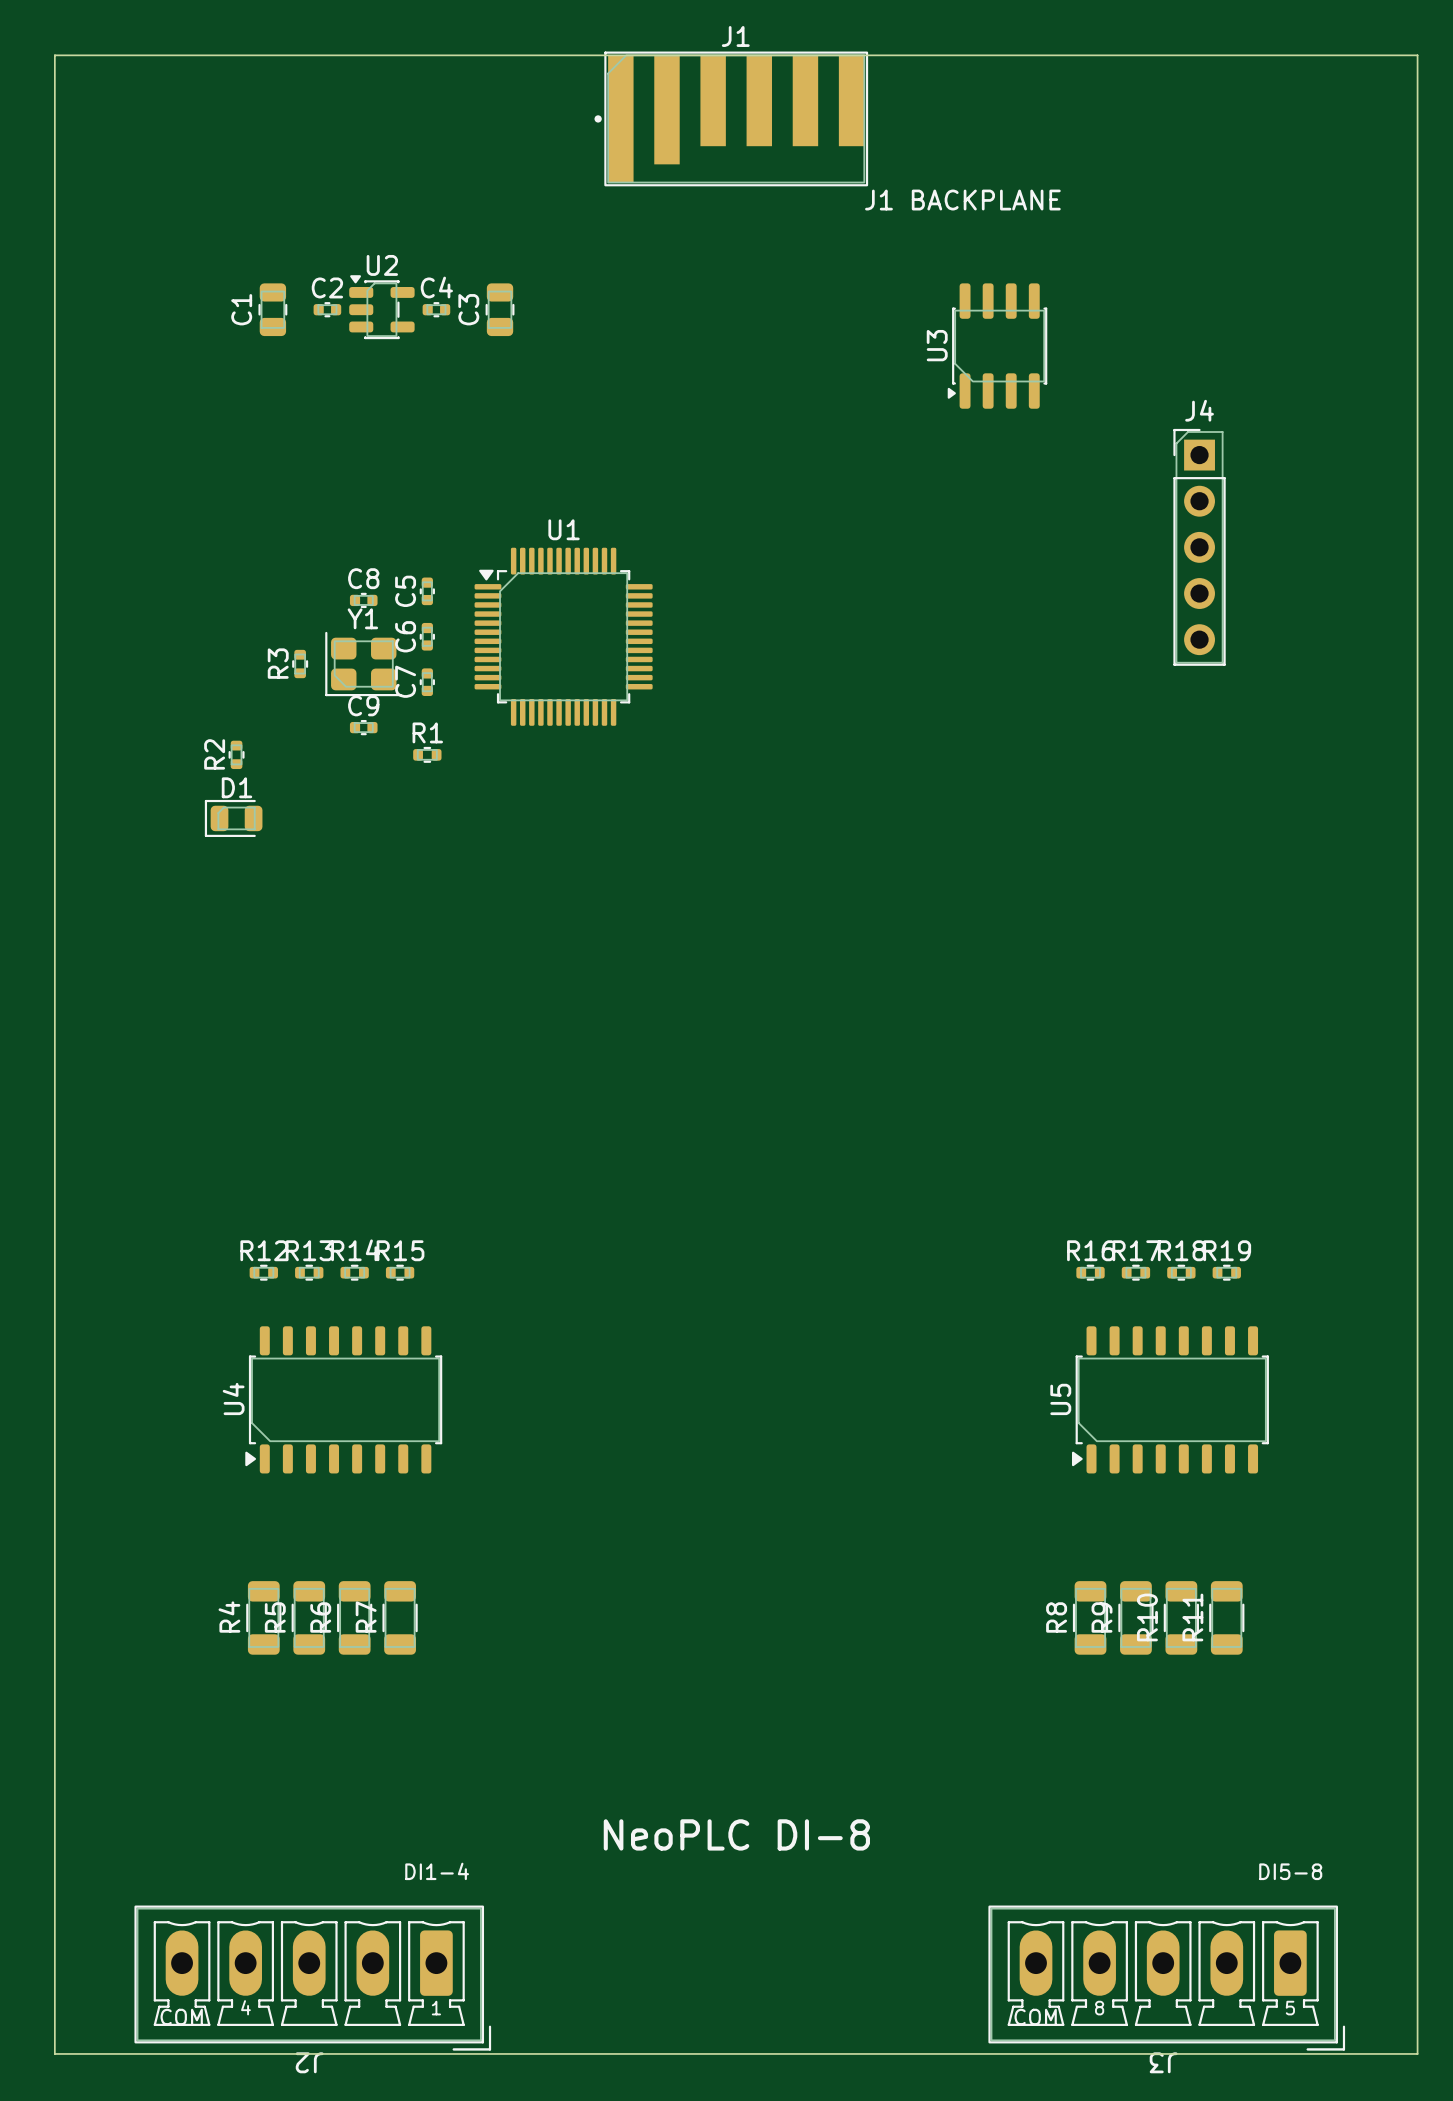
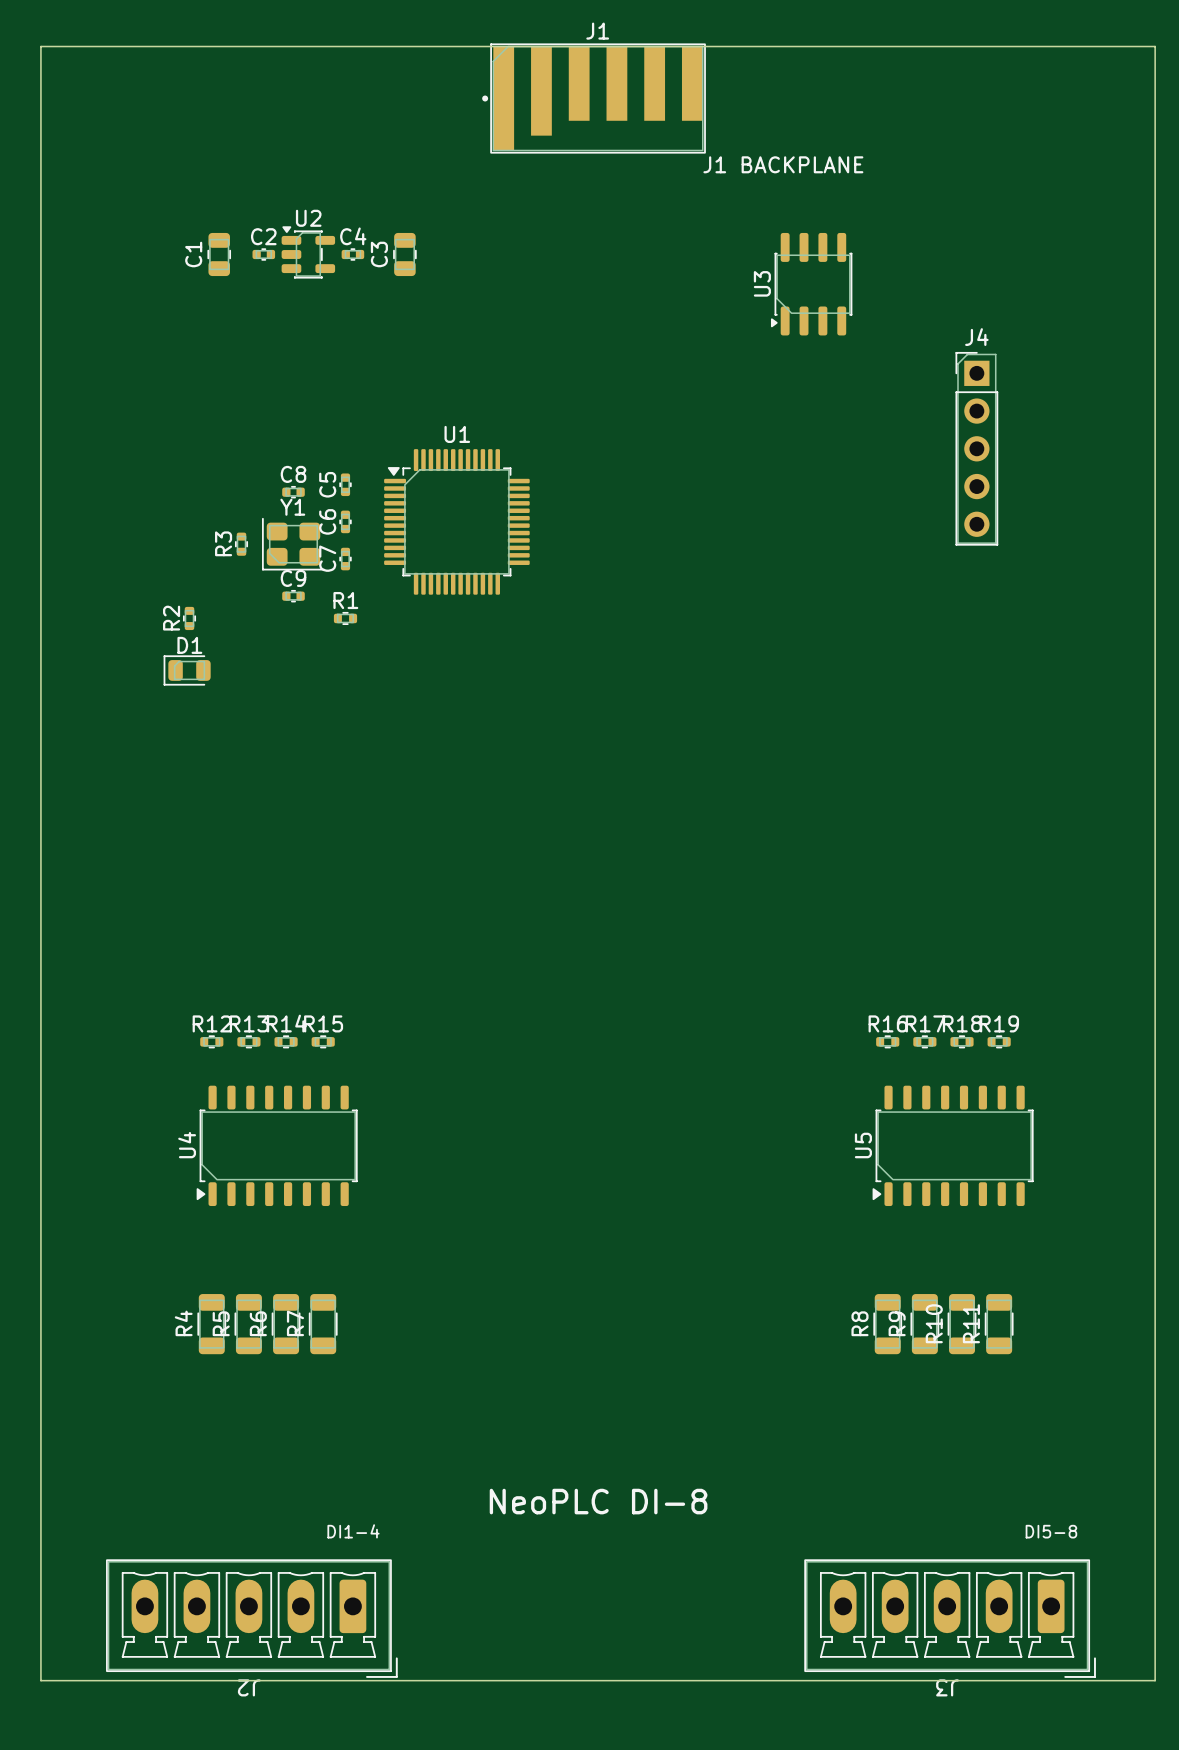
text: 4 (245, 2007) -> none
text: 1 (436, 2008) -> none
text: 8 (1099, 2008) -> none
text: 5 (1290, 2008) -> none
text: COM (181, 2017) -> none
text: COM (1035, 2017) -> none

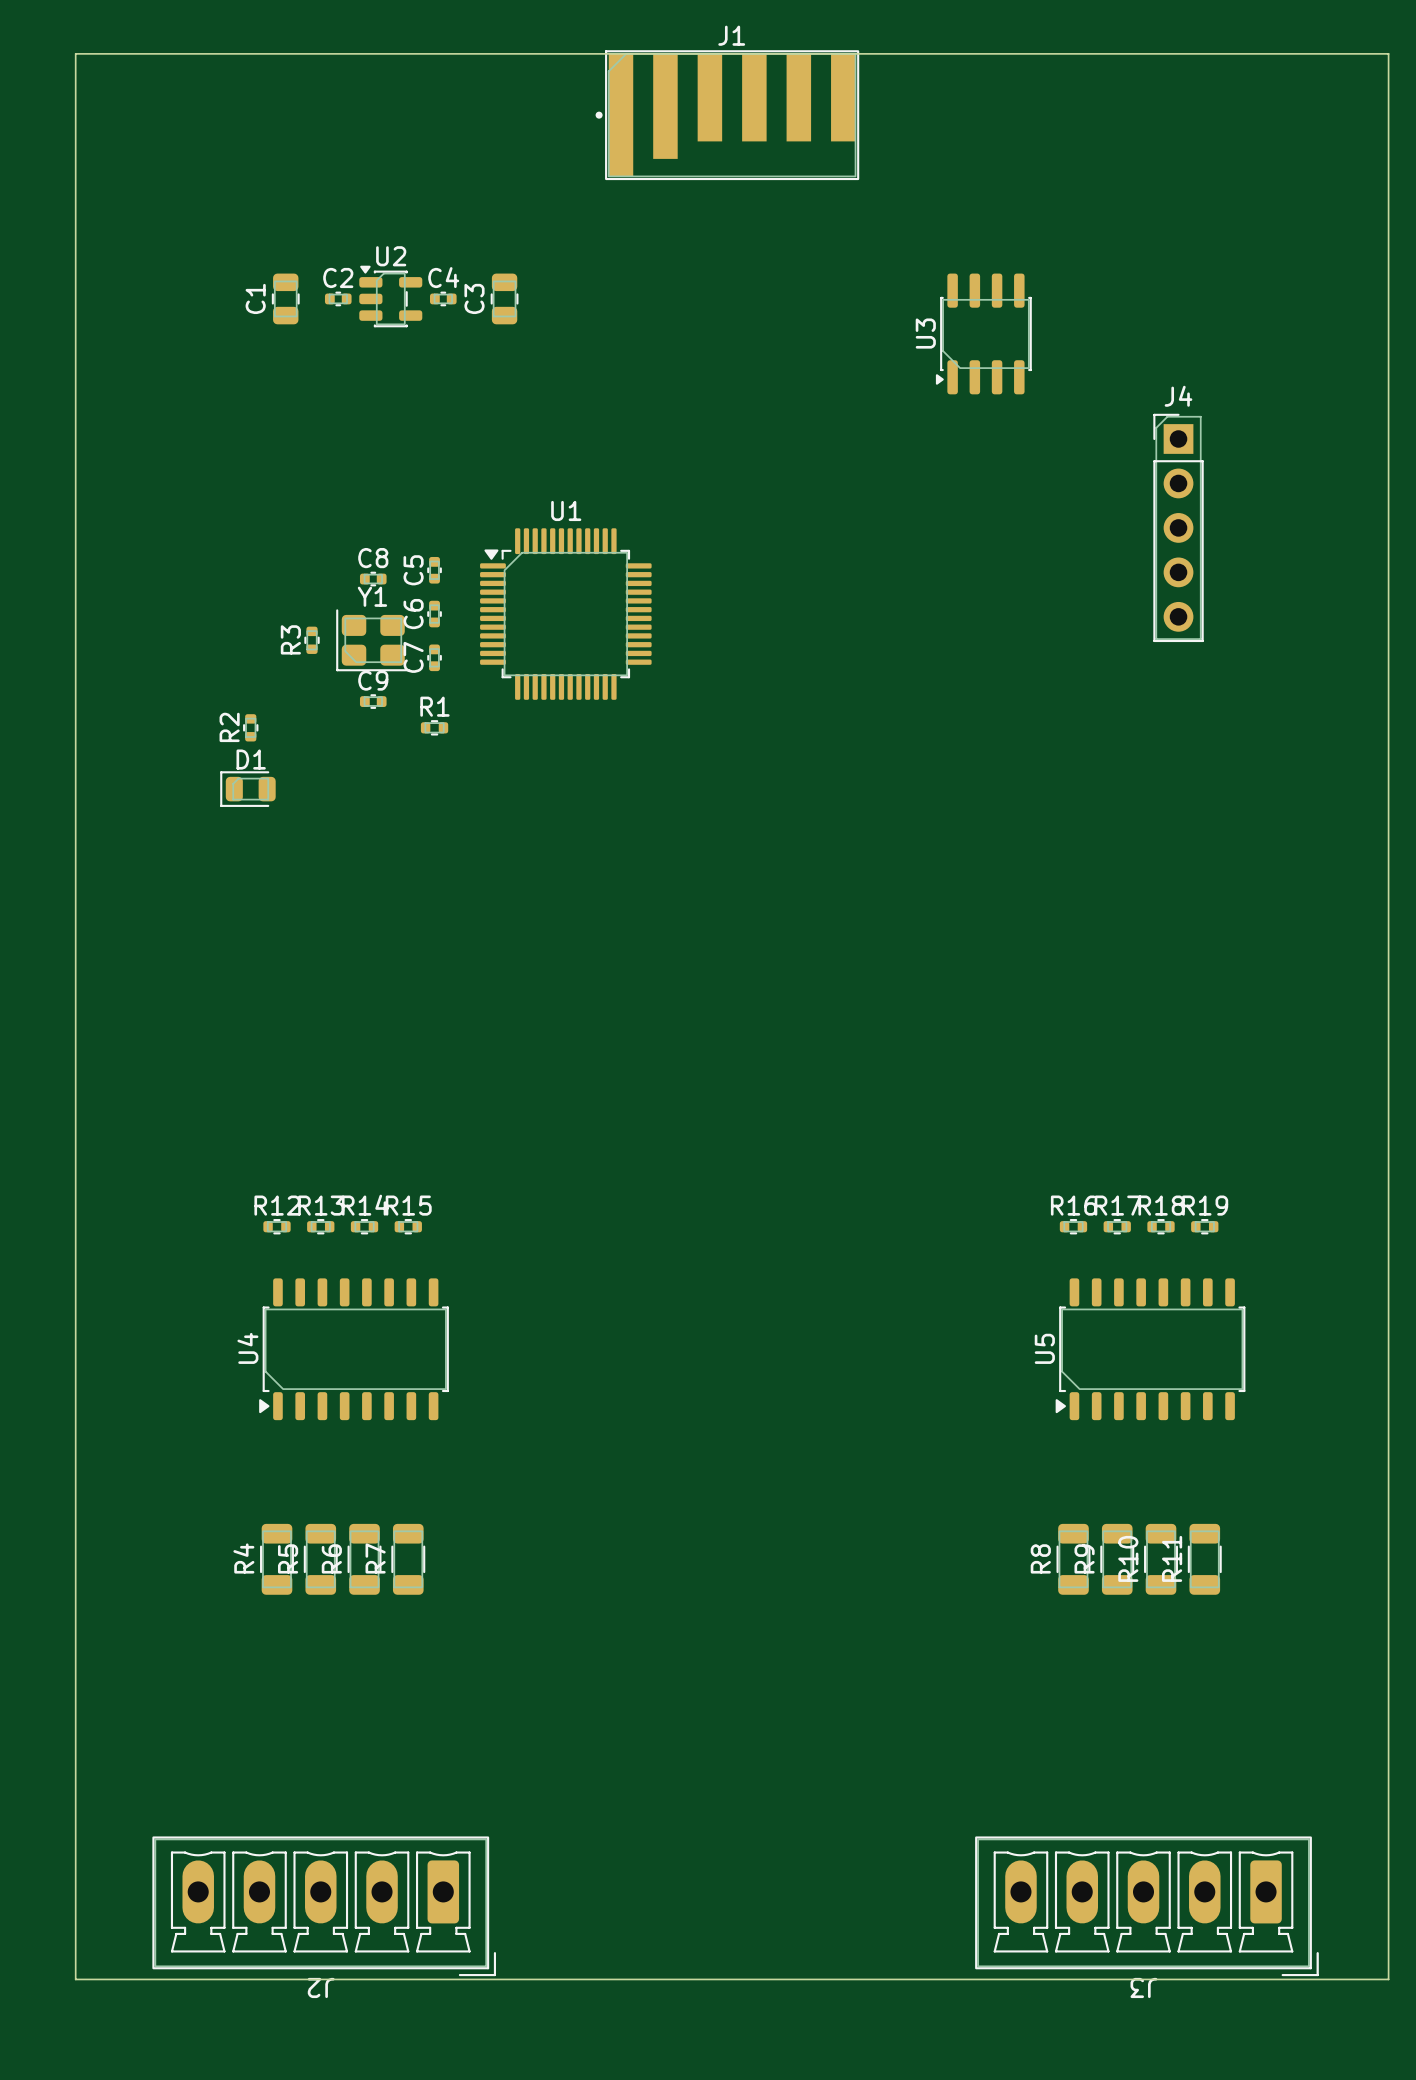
text: J1 BACKPLANE (783, 164) -> none
text: NeoPLC DI-8 (598, 1501) -> none
text: DI1-4 (353, 1531) -> none
text: DI5-8 (1051, 1531) -> none

